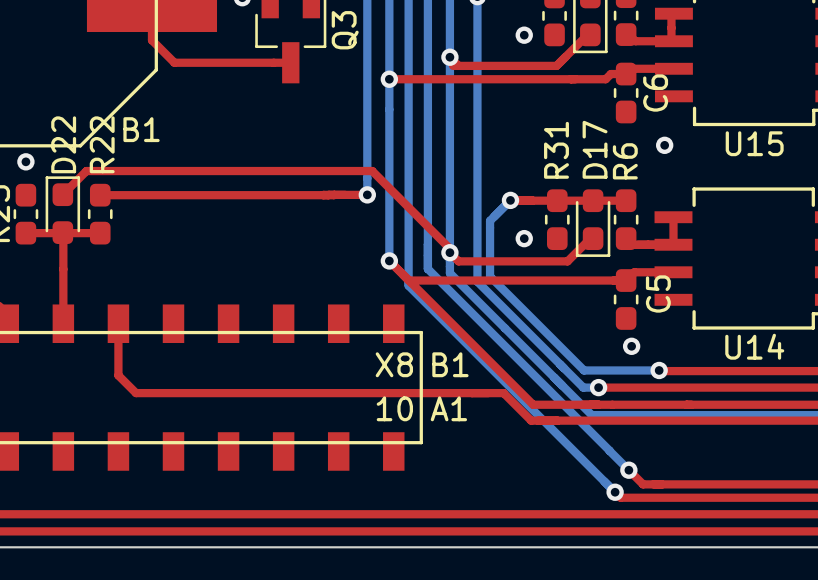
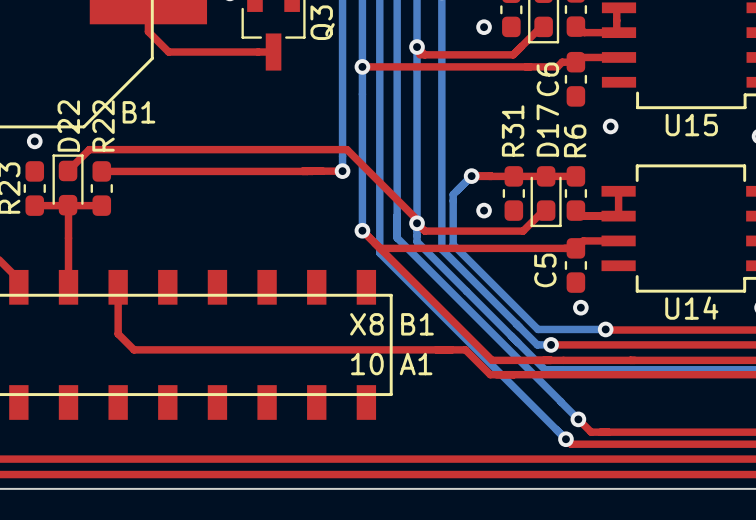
C6 name position: C6 (655, 93) -> C6 (547, 79)
C5 name position: C5 (658, 294) -> C5 (545, 270)

